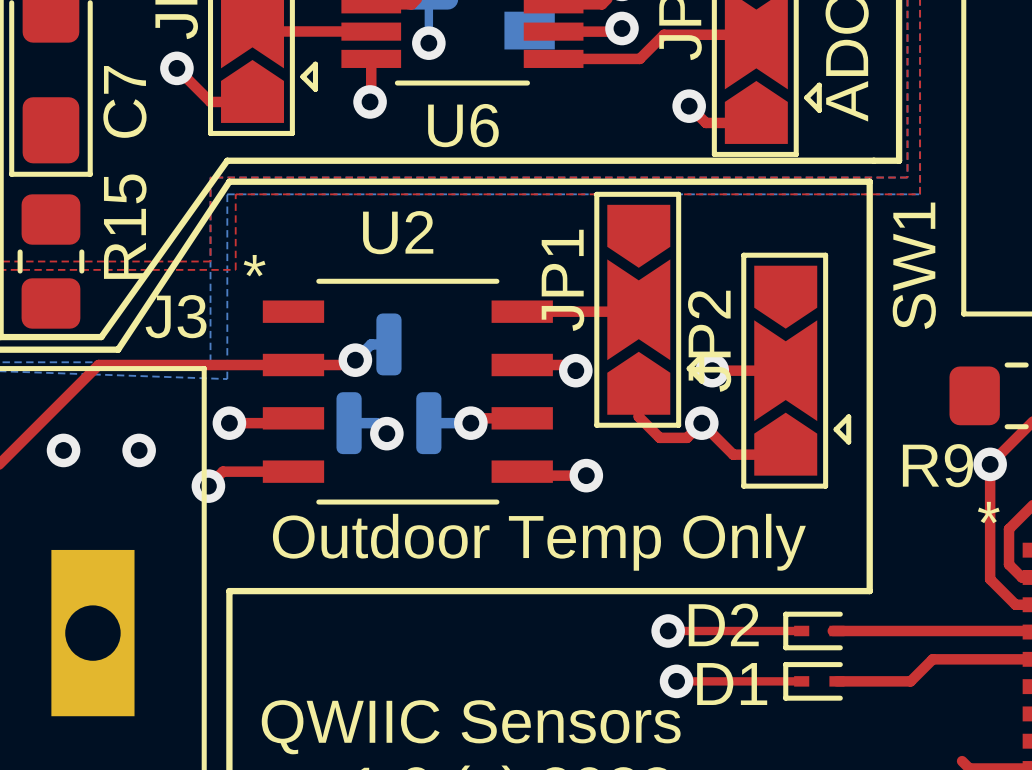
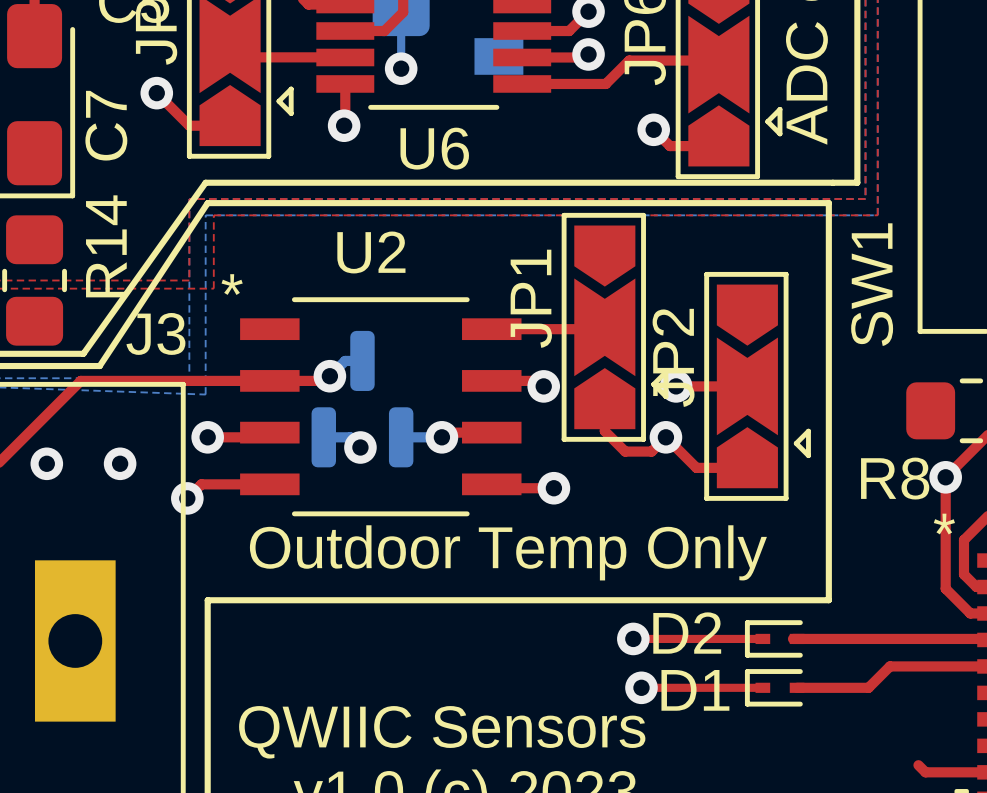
R15 name: R15 (125, 226) -> R14 (106, 246)
R9 name: R9 (937, 465) -> R8 (895, 478)

